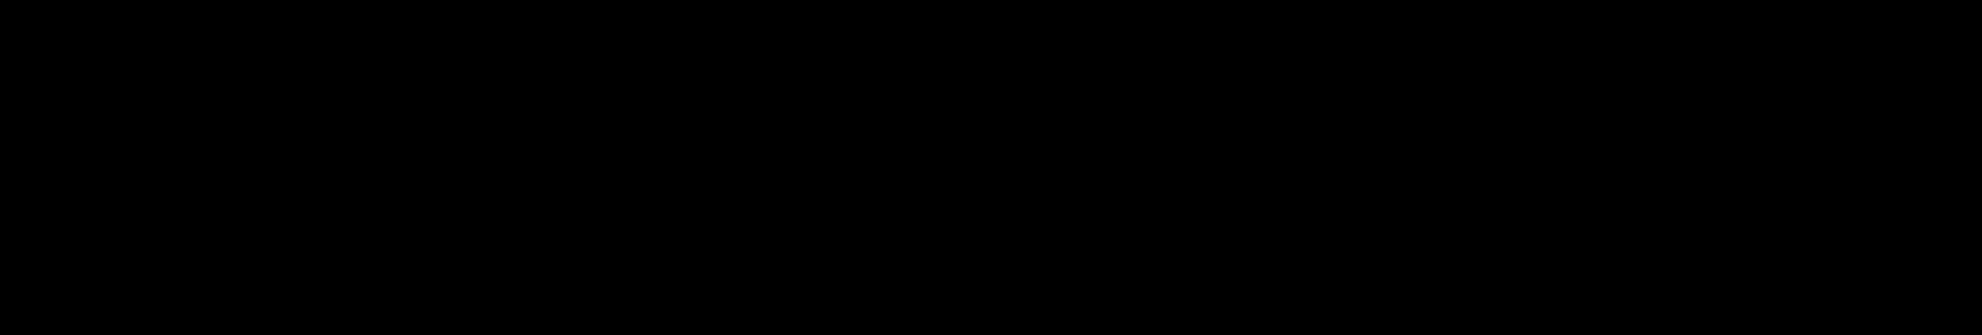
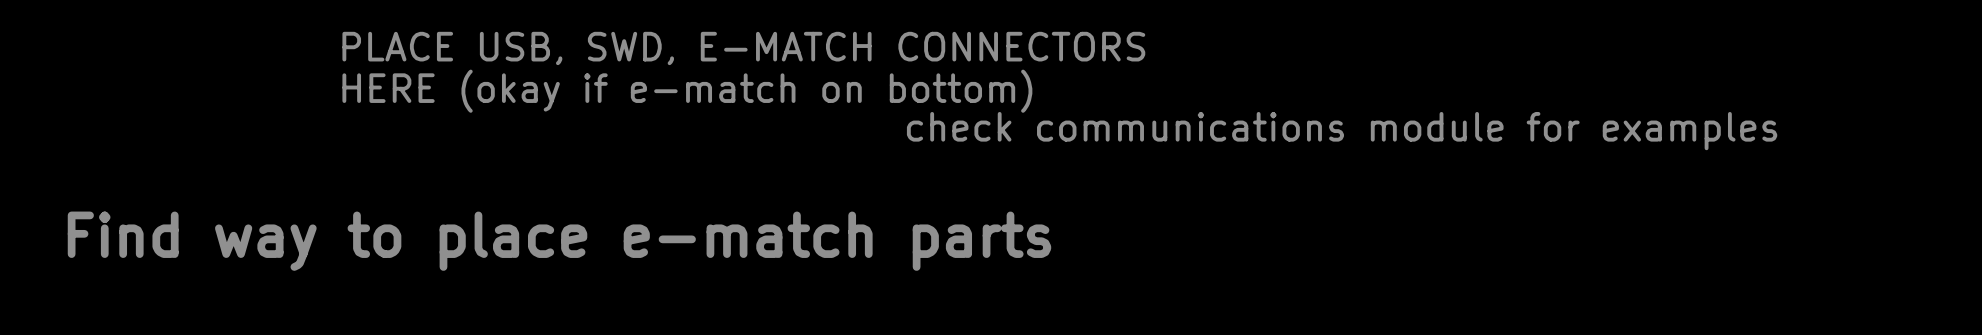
text: none -> PLACE USB, SWD, E-MATCH CONNECTORS (743, 48)
text: none -> HERE (okay if e-match on bottom) (687, 91)
text: none -> check communications module for examples (1342, 131)
text: none -> Find way to place e-match parts (559, 241)

